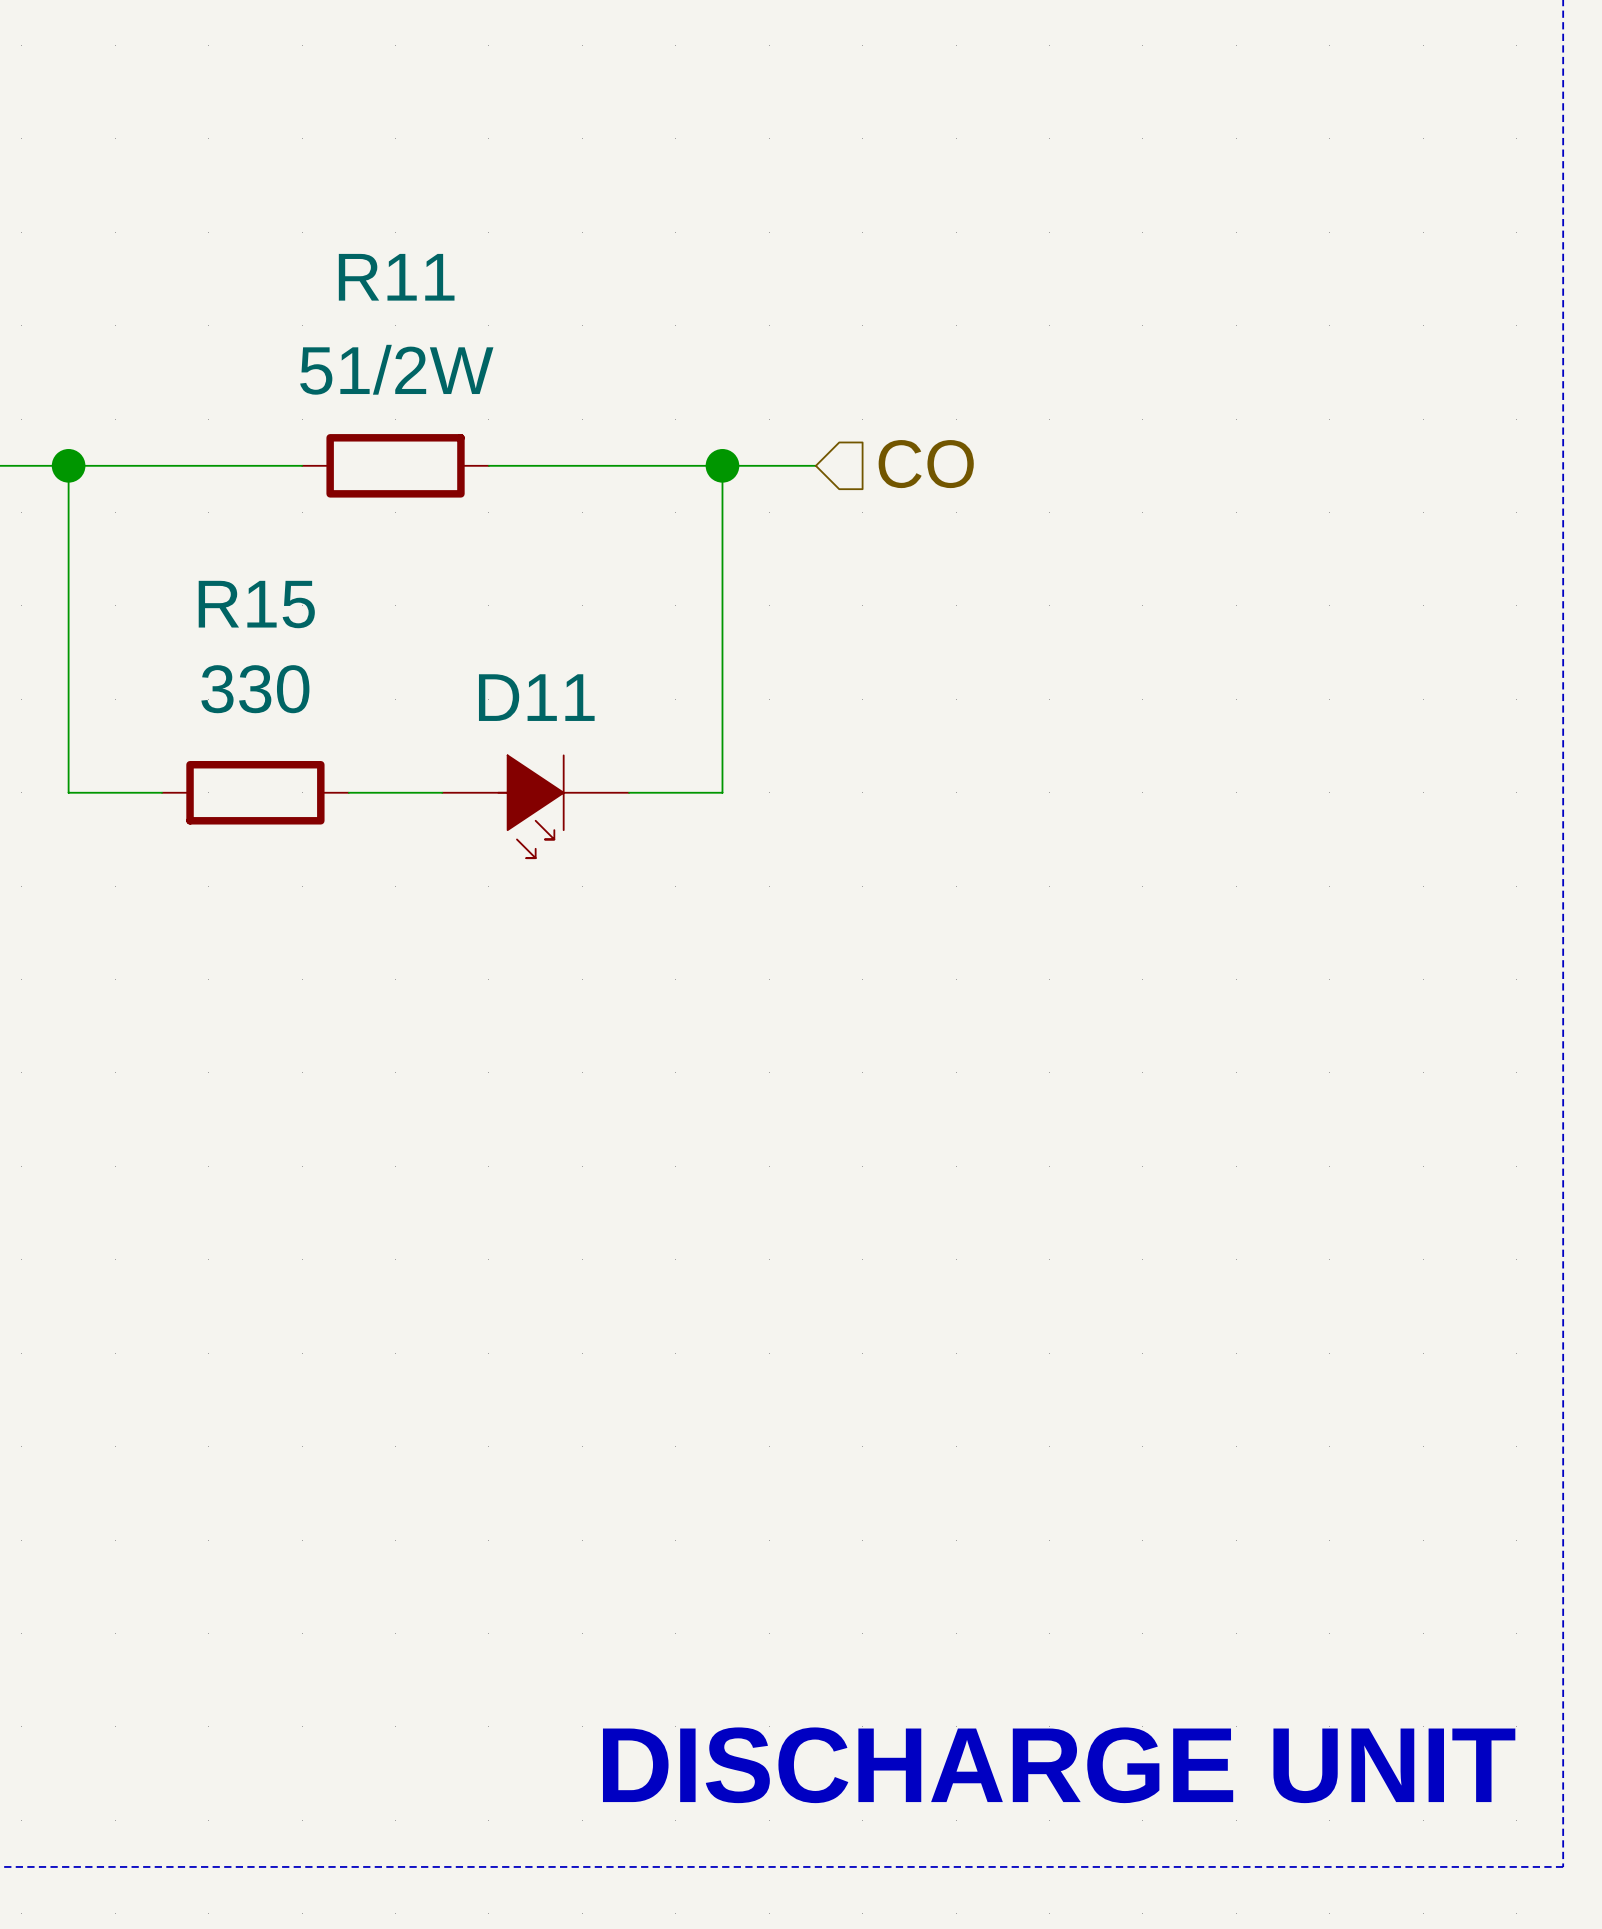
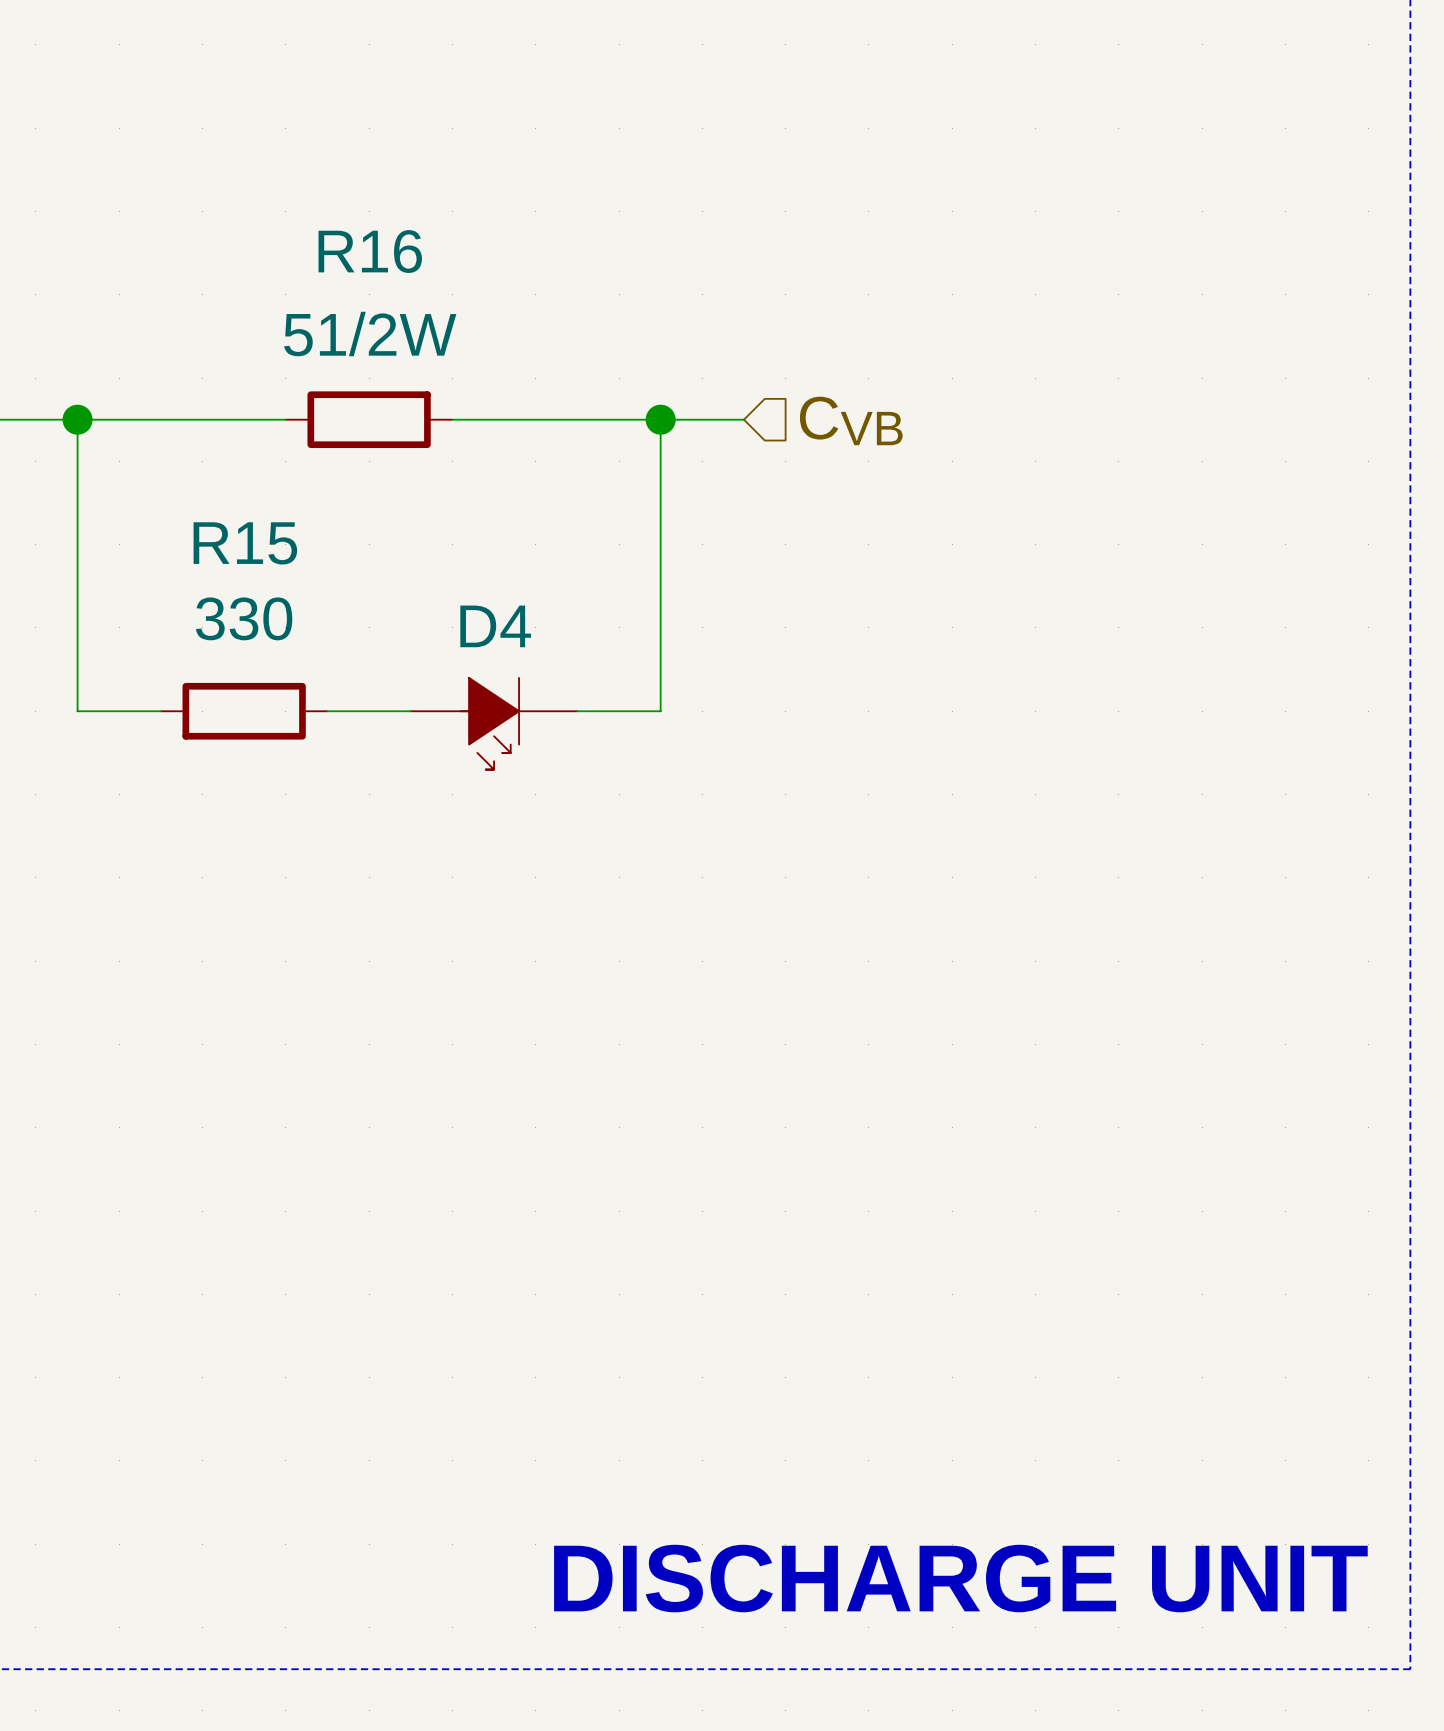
R11 name: R11 (396, 277) -> R16 (370, 251)
hierarchical label: CO (926, 464) -> CVB (851, 420)
D11 name: D11 (536, 697) -> D4 (495, 626)

